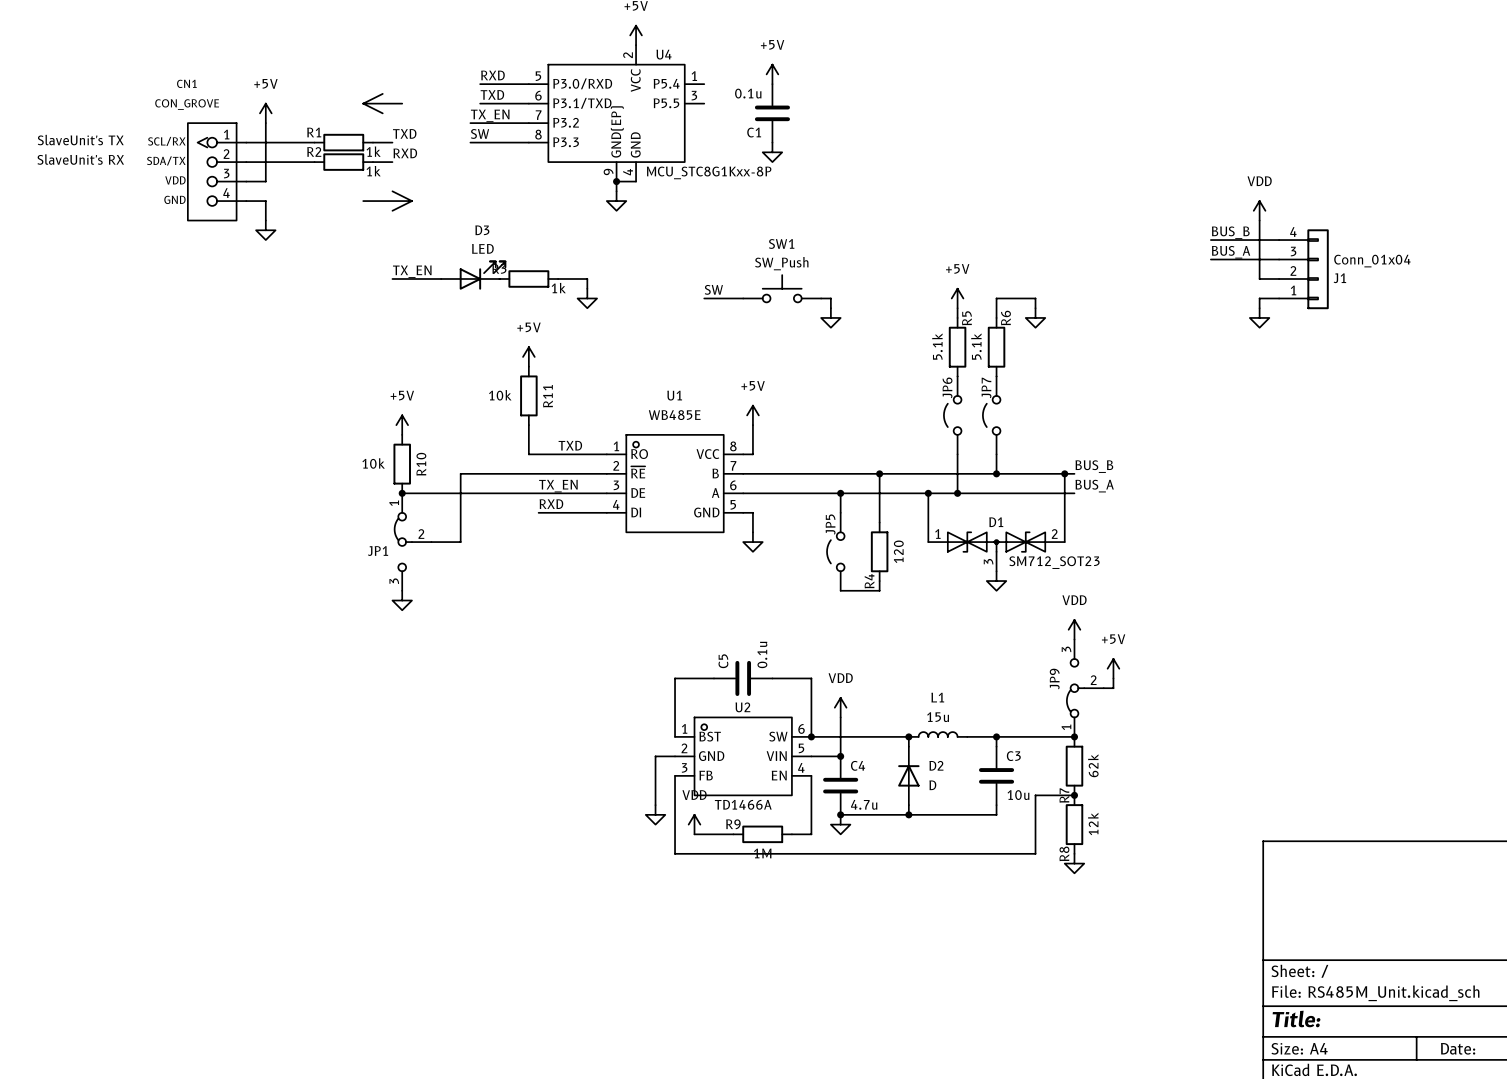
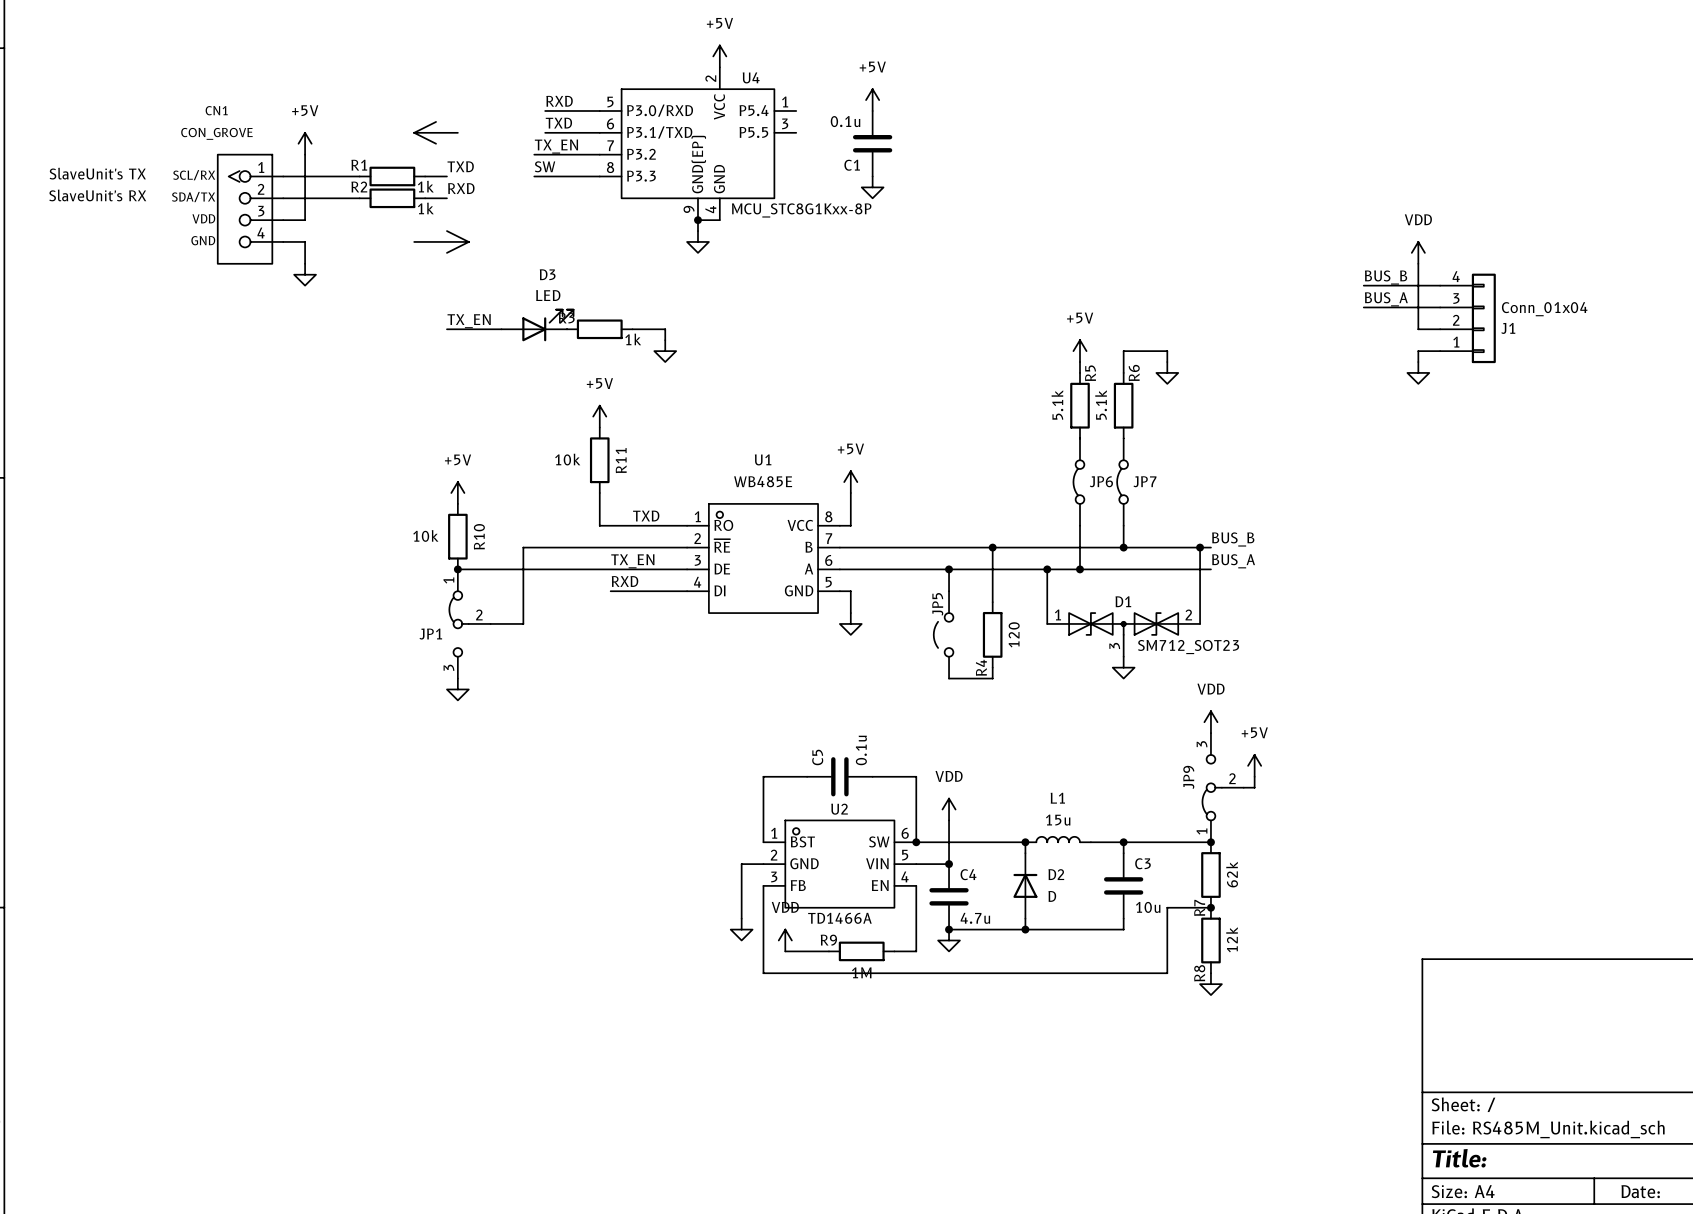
SW1: SW_Push (782, 288) -> none
label: SW (713, 289) -> none
wire: (704, 298) (743, 298) -> none
wire: (821, 298) (830, 298) (830, 308) -> none
power symbol: (830, 317) -> none
JP6 symbol: [943, 376, 962, 455] -> [1073, 438, 1085, 526]
JP7 symbol: [982, 376, 1001, 455] -> [1117, 438, 1129, 526]
JP6 name position: JP6 (947, 387) -> JP6 (1101, 481)
JP7 name position: JP7 (986, 387) -> JP7 (1144, 481)

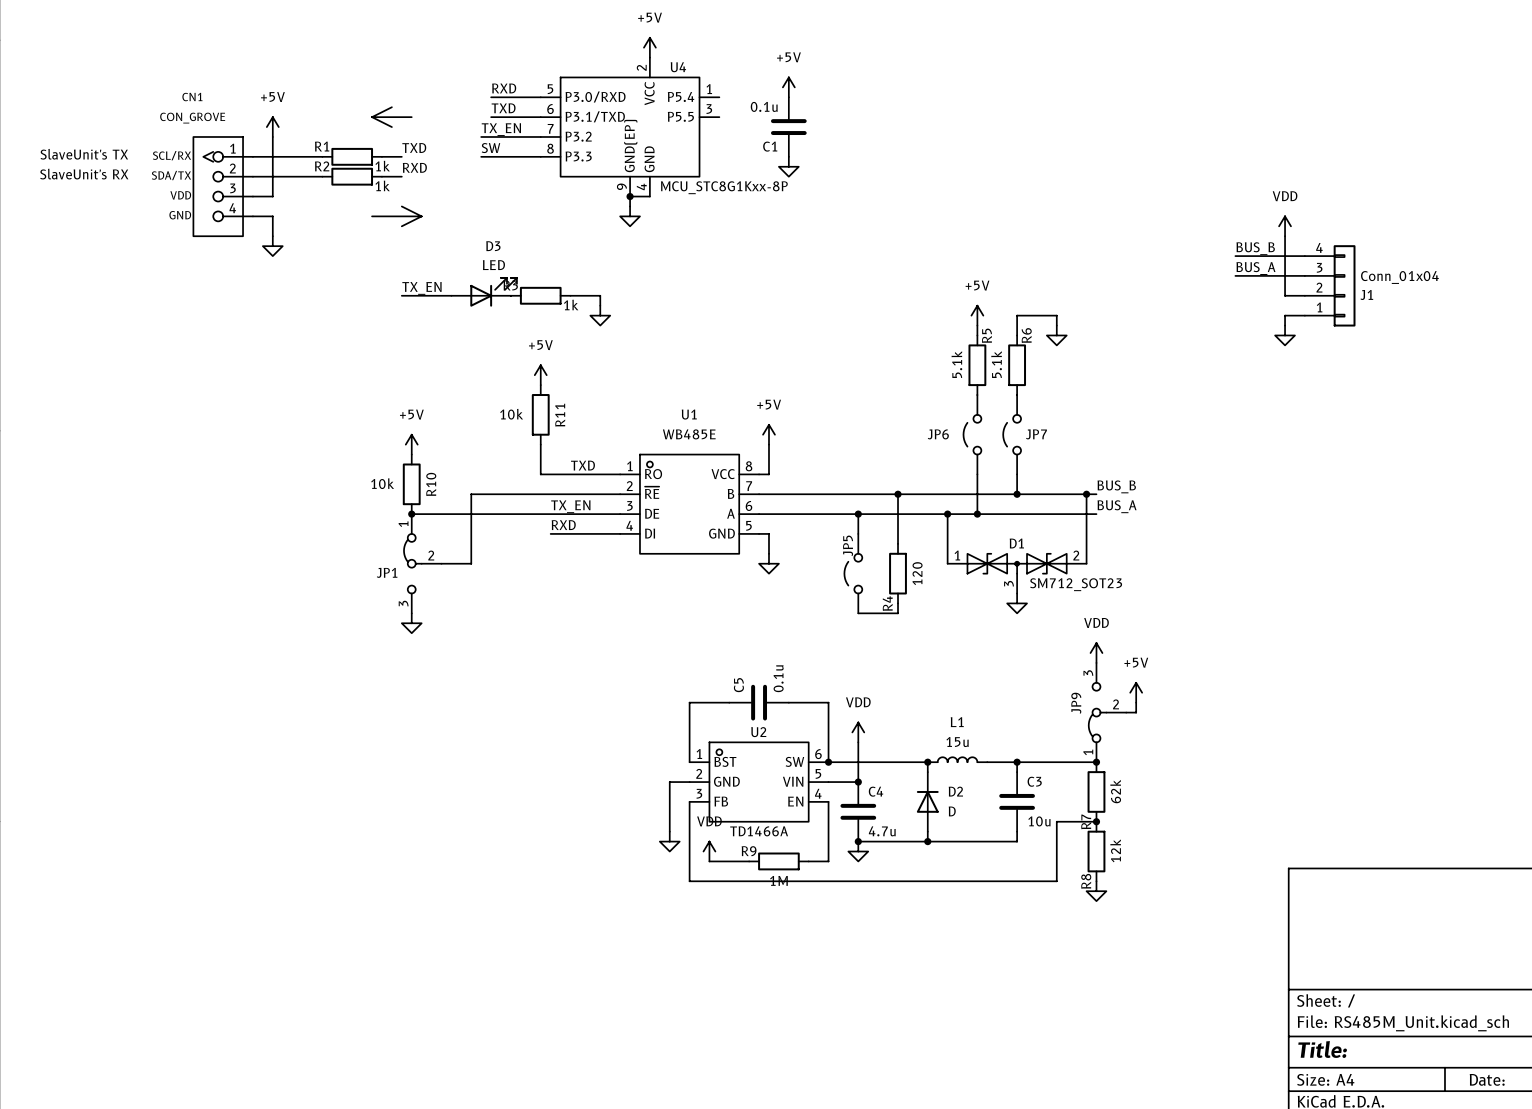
JP6 symbol: [1073, 438, 1085, 526] -> [963, 395, 982, 475]
JP7 symbol: [1117, 438, 1129, 526] -> [1003, 395, 1022, 475]
JP6 name position: JP6 (1101, 481) -> JP6 (938, 434)

